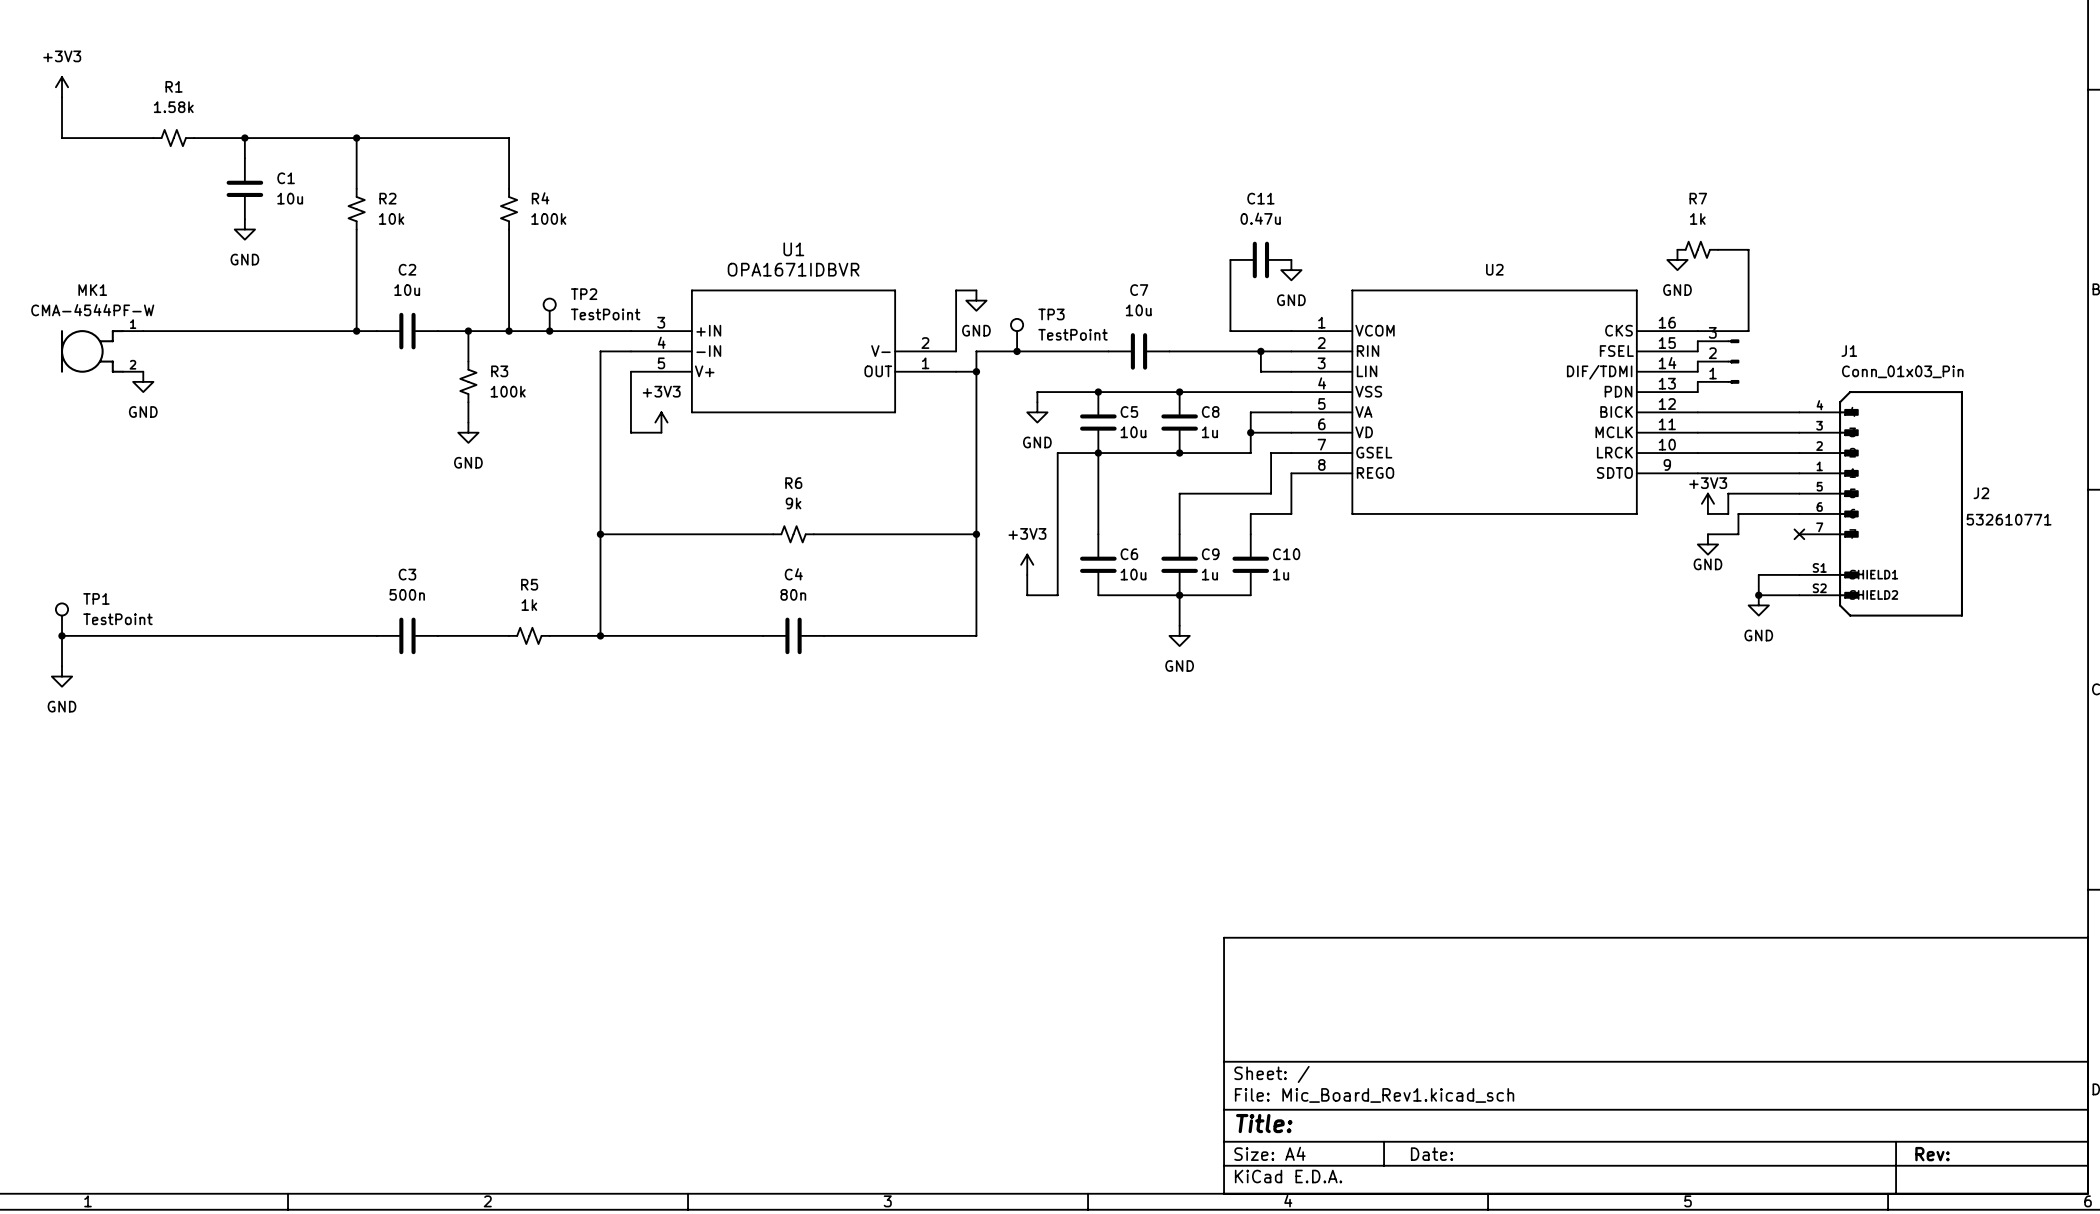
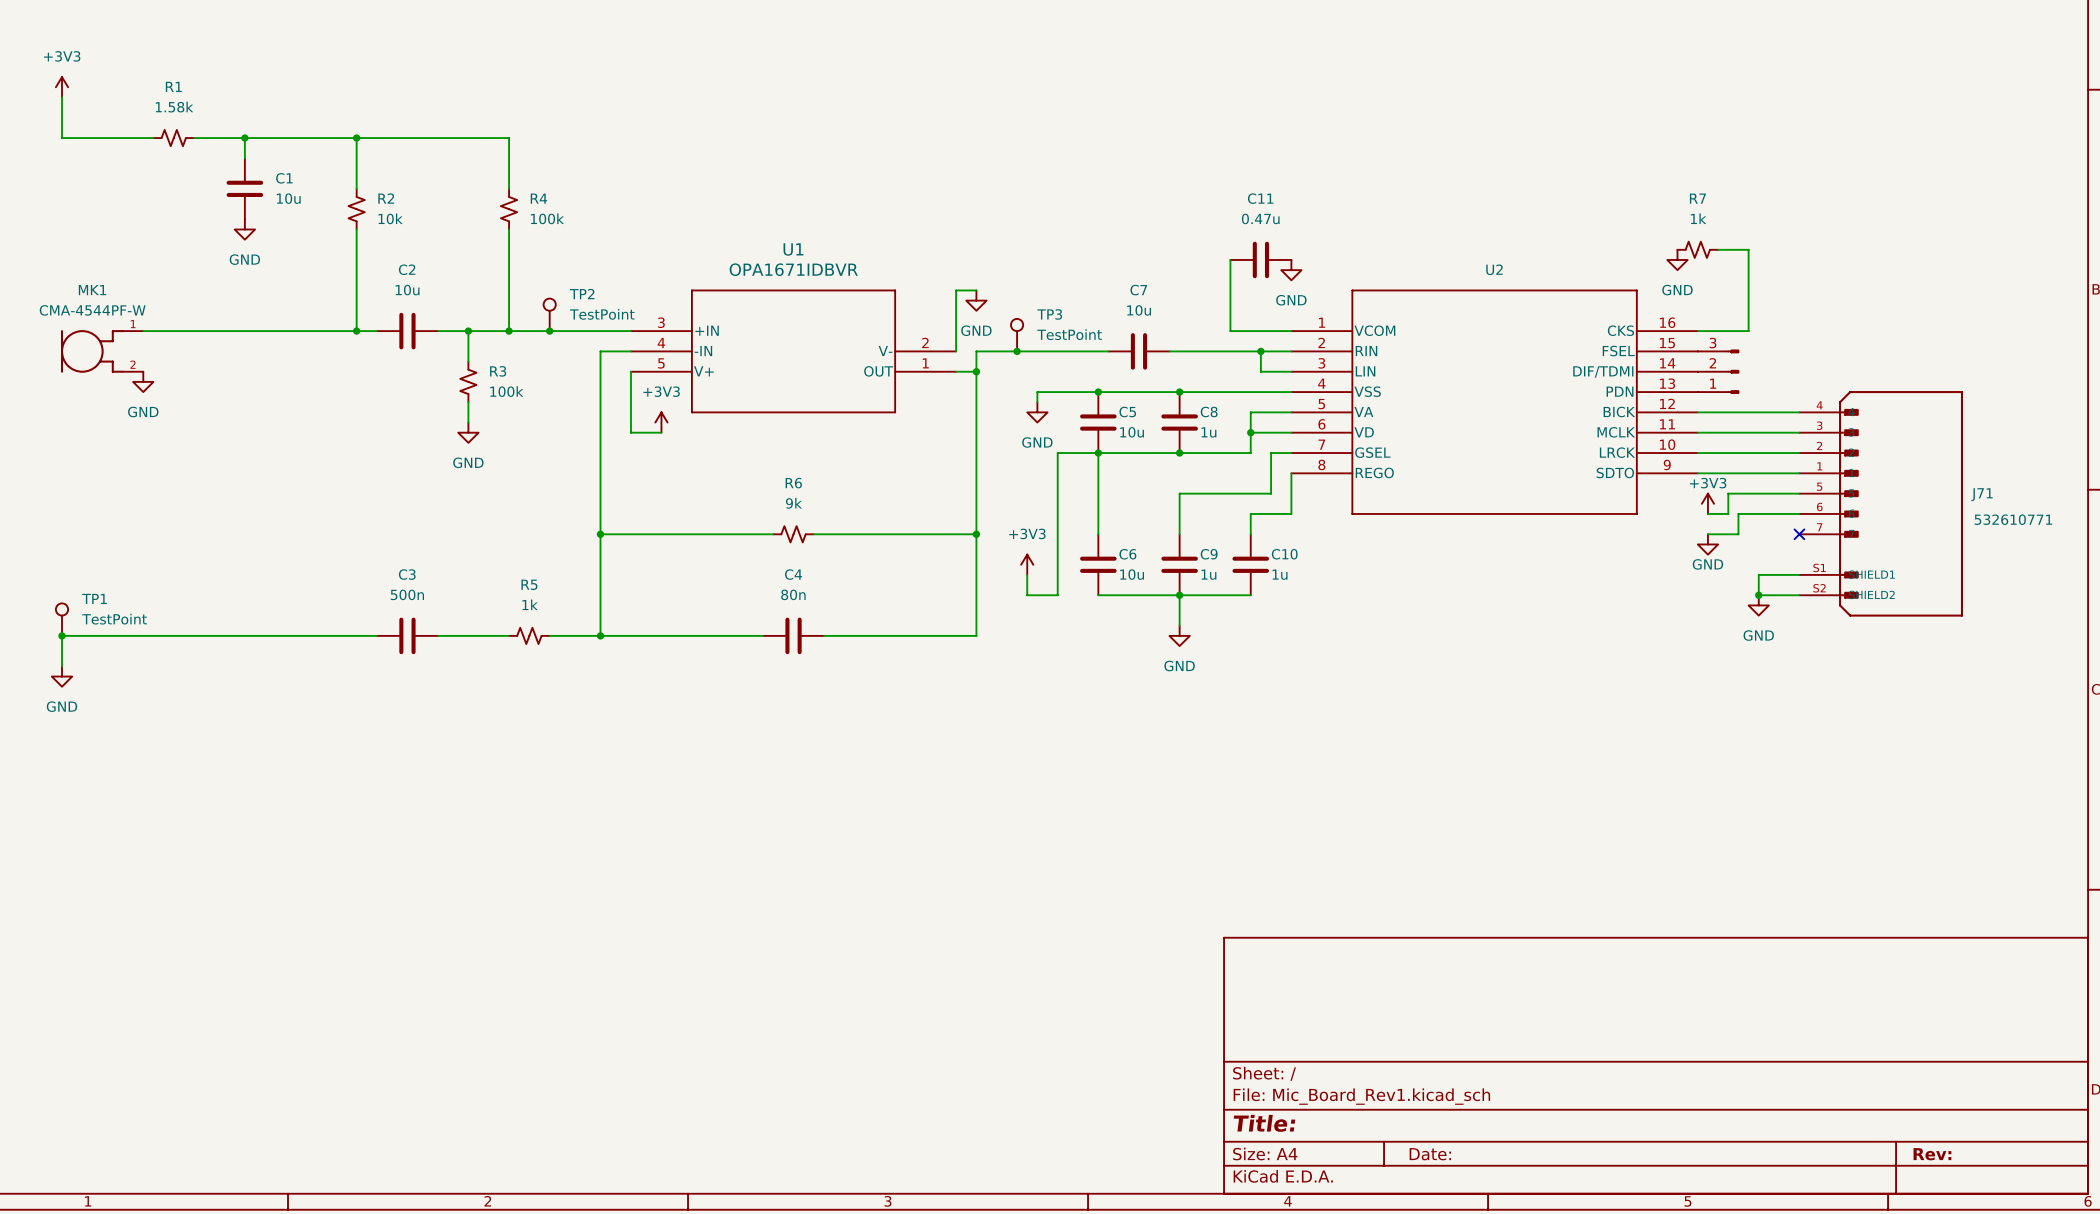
wire: (1697, 341) (1697, 351) -> none
wire: (1697, 361) (1697, 371) -> none
J1: Conn_01x03_Pin (1718, 361) -> none
part: none -> (1718, 371)
wire: (1697, 381) (1697, 392) -> none
J2 name: J2 (1981, 493) -> J71 (1982, 494)

